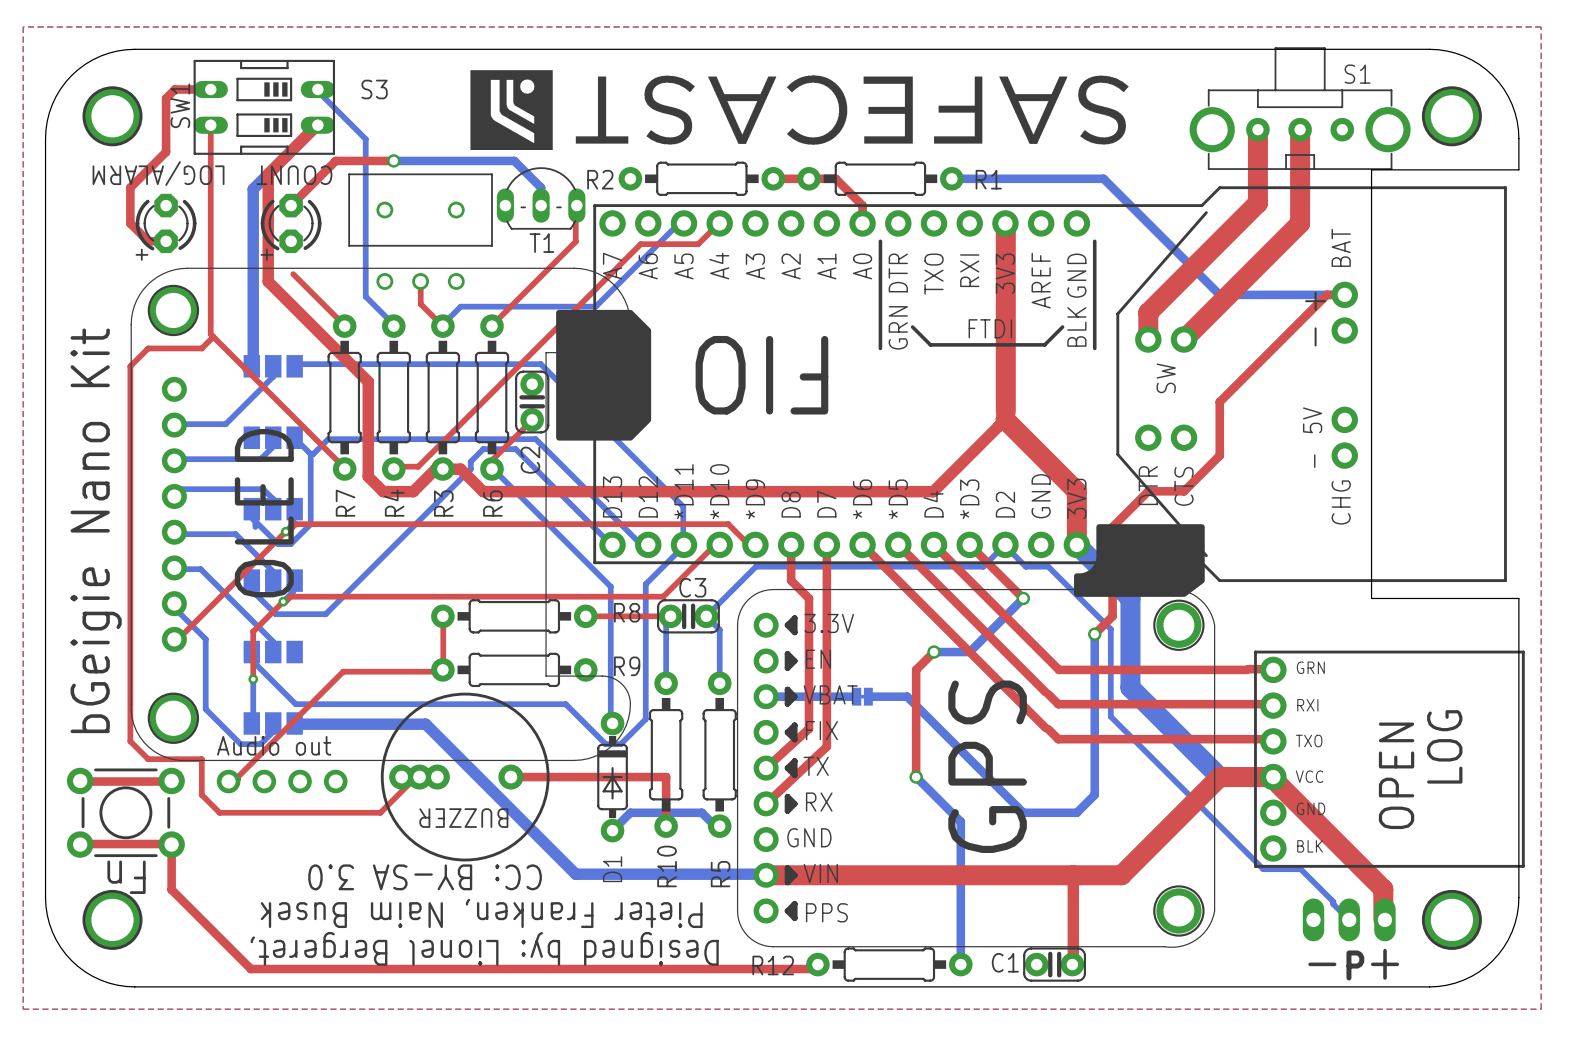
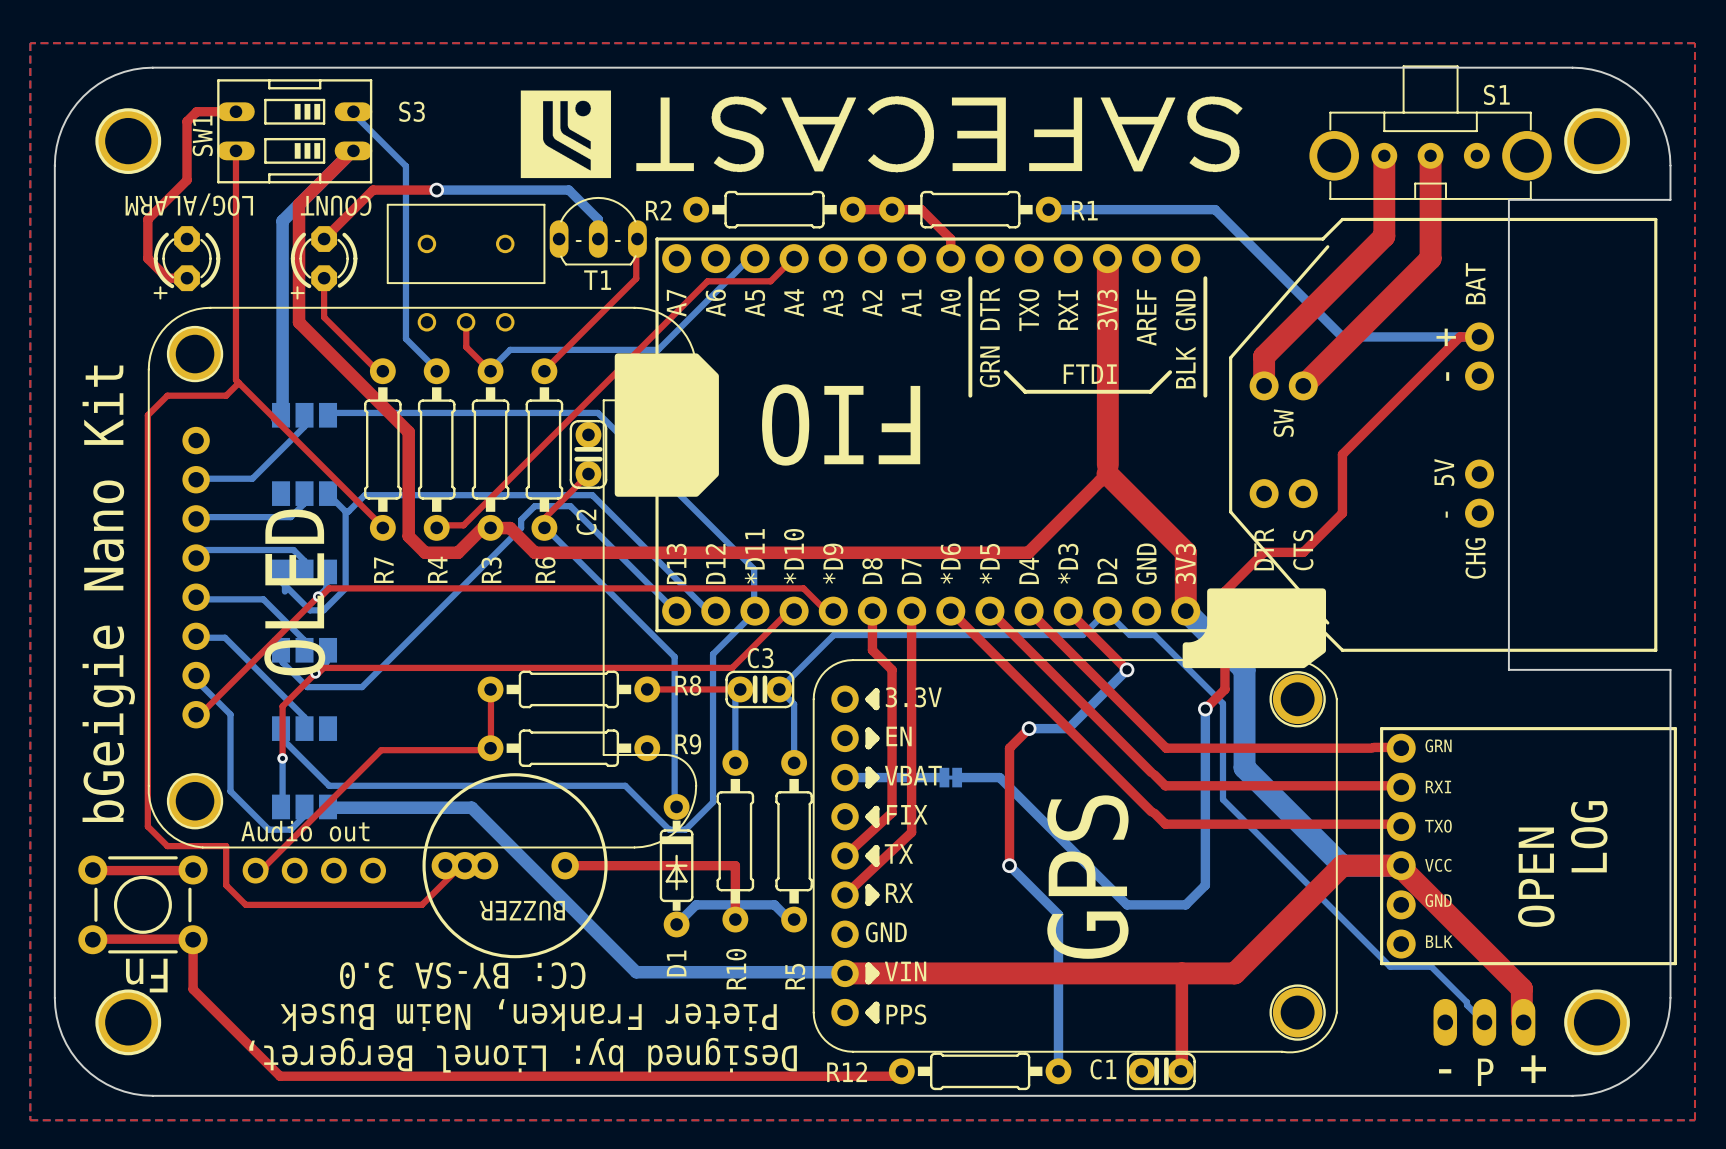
top track: (293, 274) (344, 326) -> (324, 278) (324, 317) (377, 371) (382, 371)

